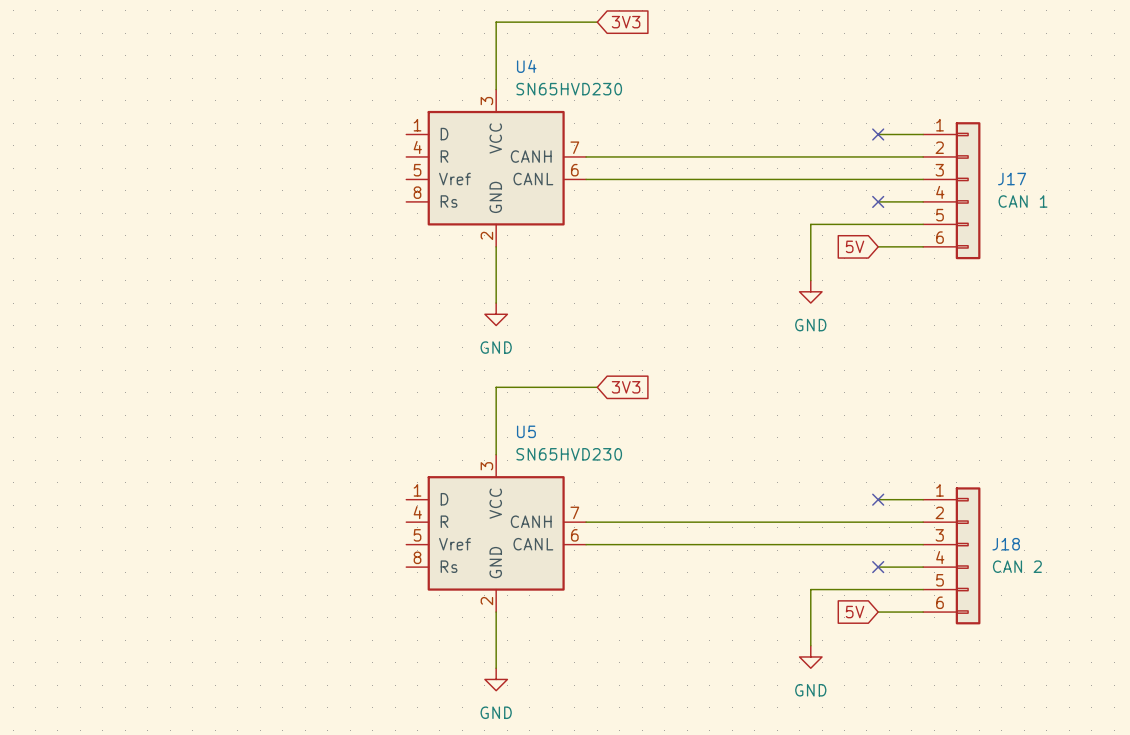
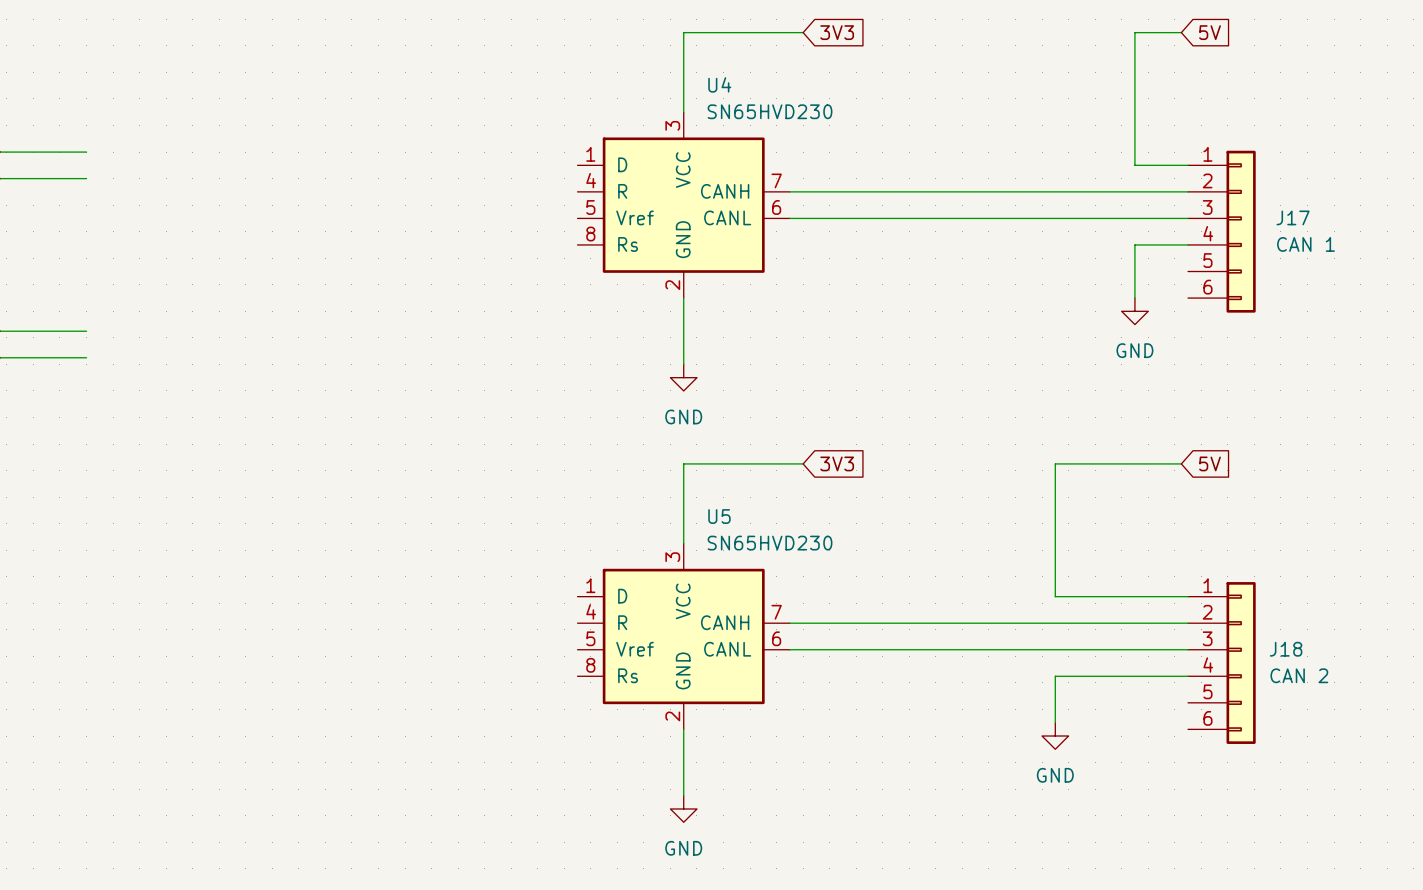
wire: none -> (1181, 32) (1134, 32) (1134, 165)
global label: none -> 5V (1210, 32)
no-connect mark: (878, 134) -> none
no-connect mark: (878, 201) -> none
wire: (923, 224) (810, 224) (810, 280) -> none
global label: 5V (855, 246) -> none
wire: (878, 246) (923, 246) -> (1134, 298) (1134, 244)
power symbol position: GND (810, 291) -> GND (1134, 311)
wire: none -> (1181, 463) (1055, 463) (1055, 596) (1134, 596)
global label: none -> 5V (1210, 463)
no-connect mark: (878, 499) -> none
no-connect mark: (878, 567) -> none
wire: (810, 589) (923, 589) -> (1055, 702) (1055, 676) (1134, 676)
wire: (810, 606) (810, 645) -> none
global label: 5V (855, 612) -> none
wire: (878, 612) (923, 612) -> none
power symbol position: GND (810, 656) -> GND (1055, 736)

